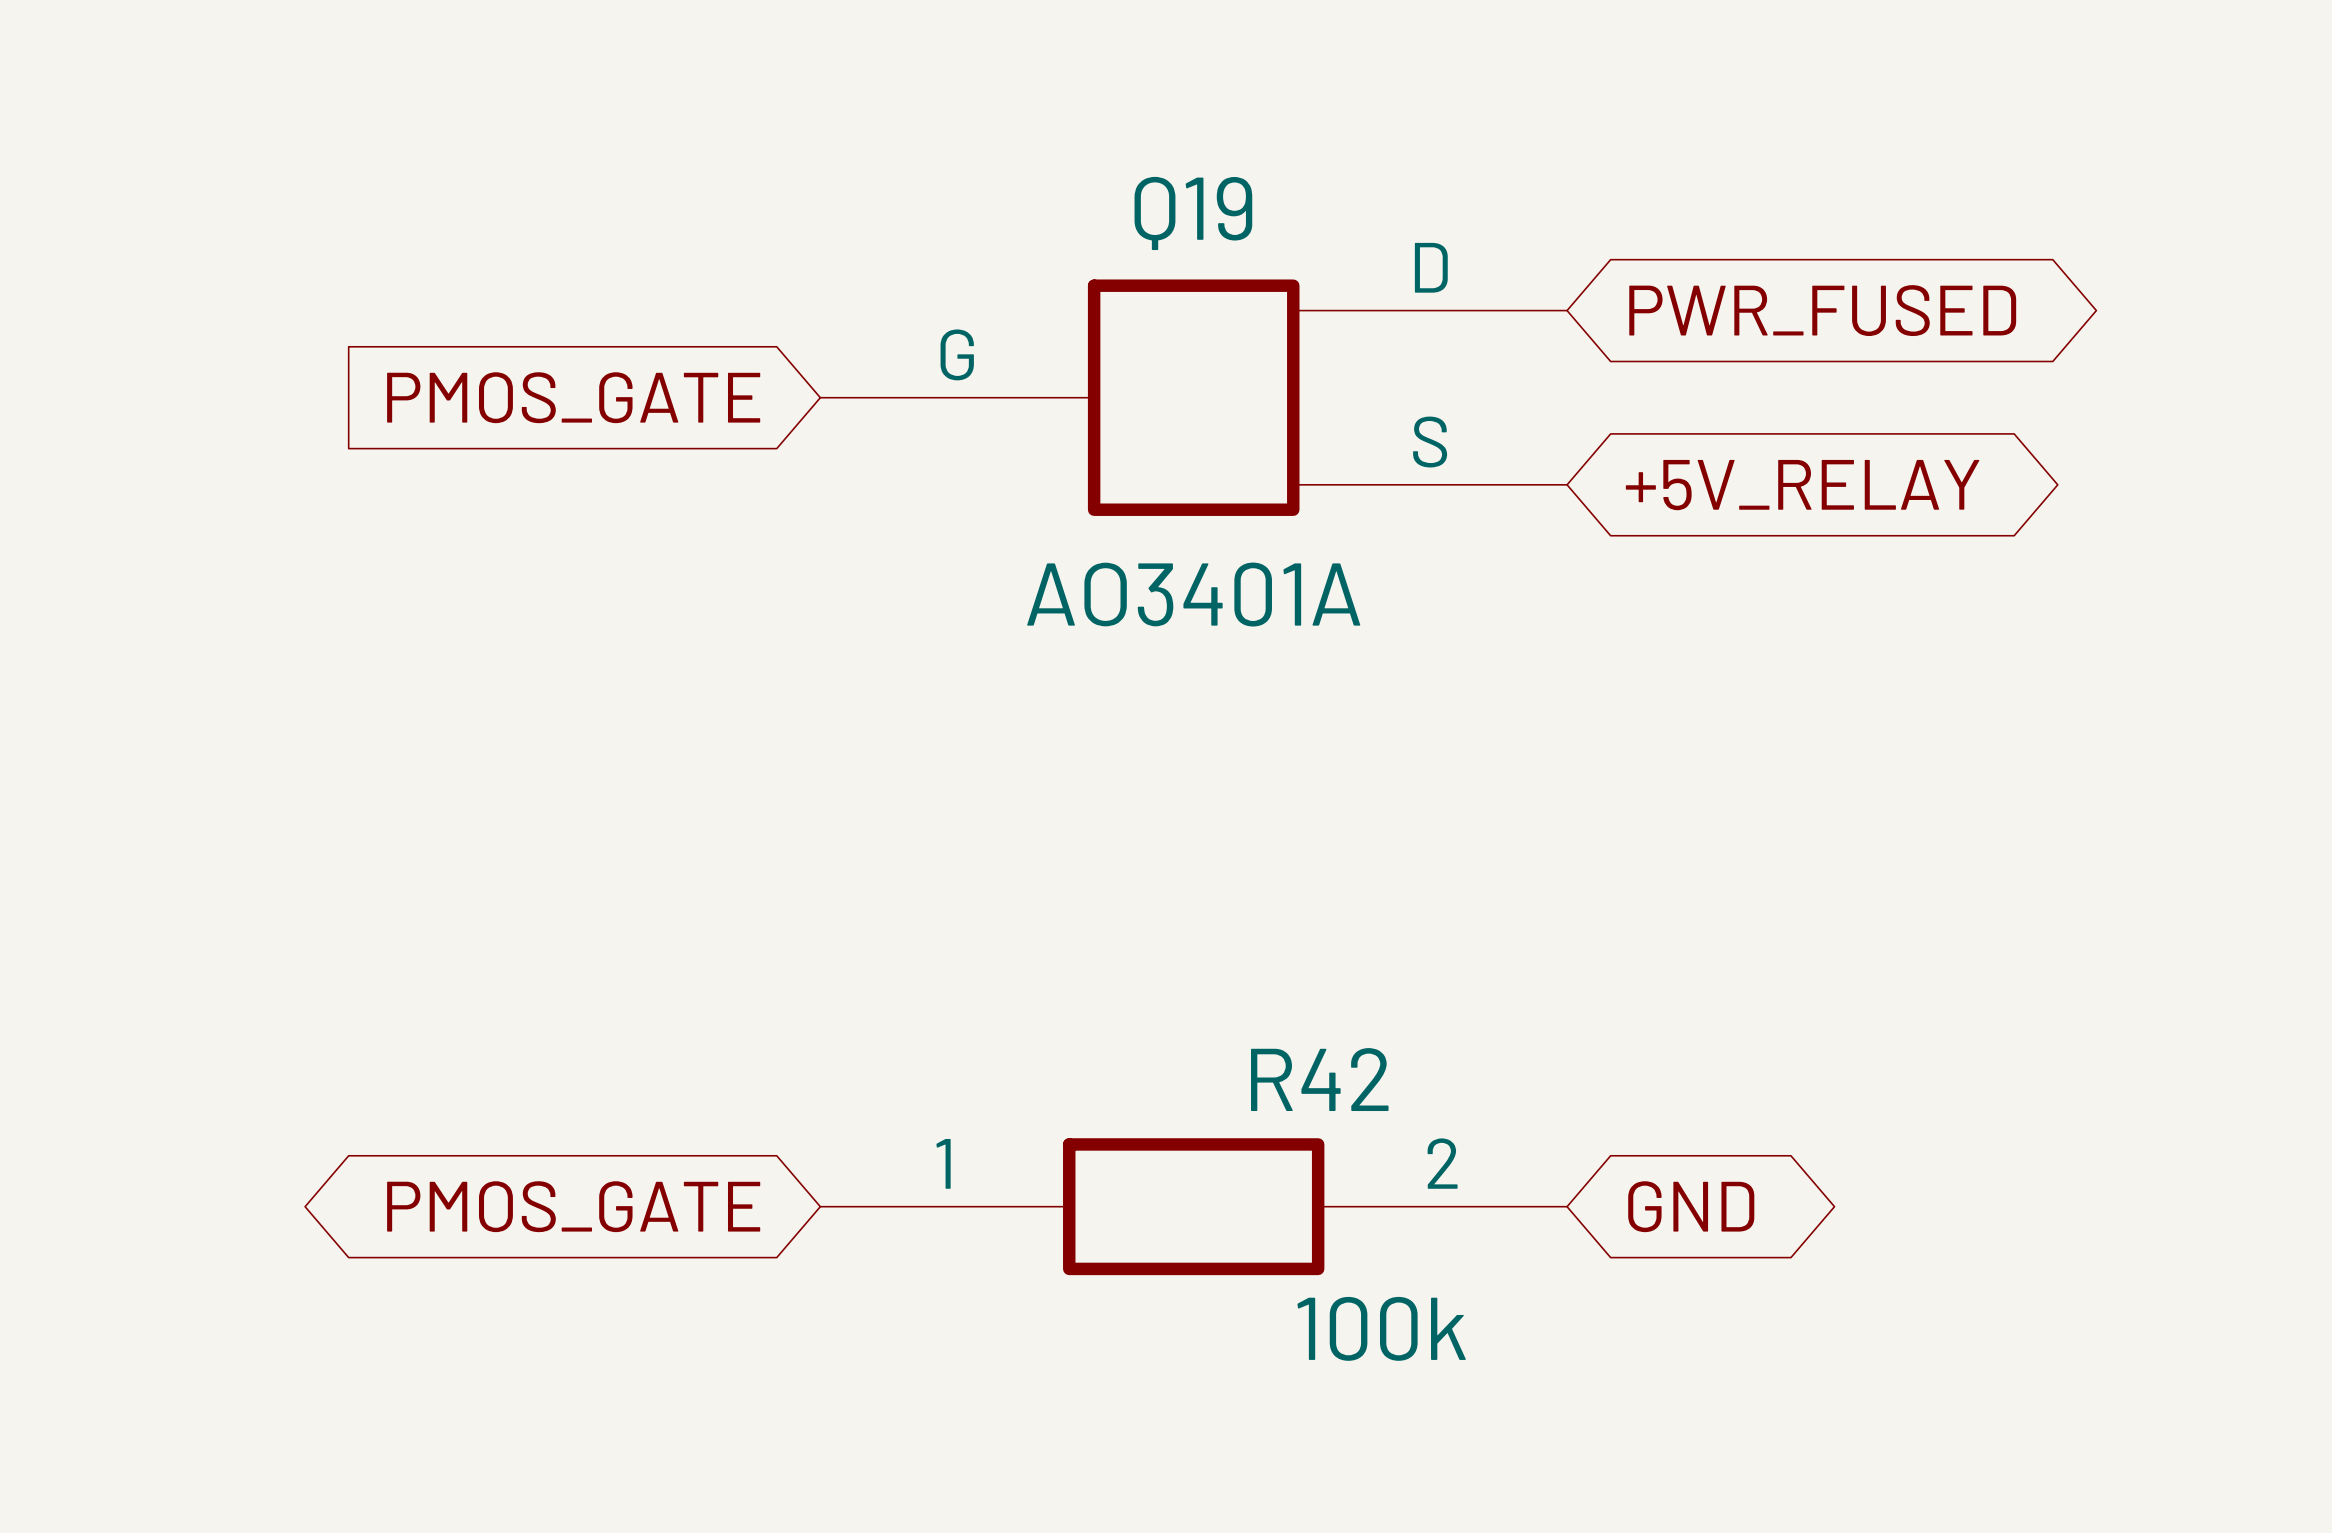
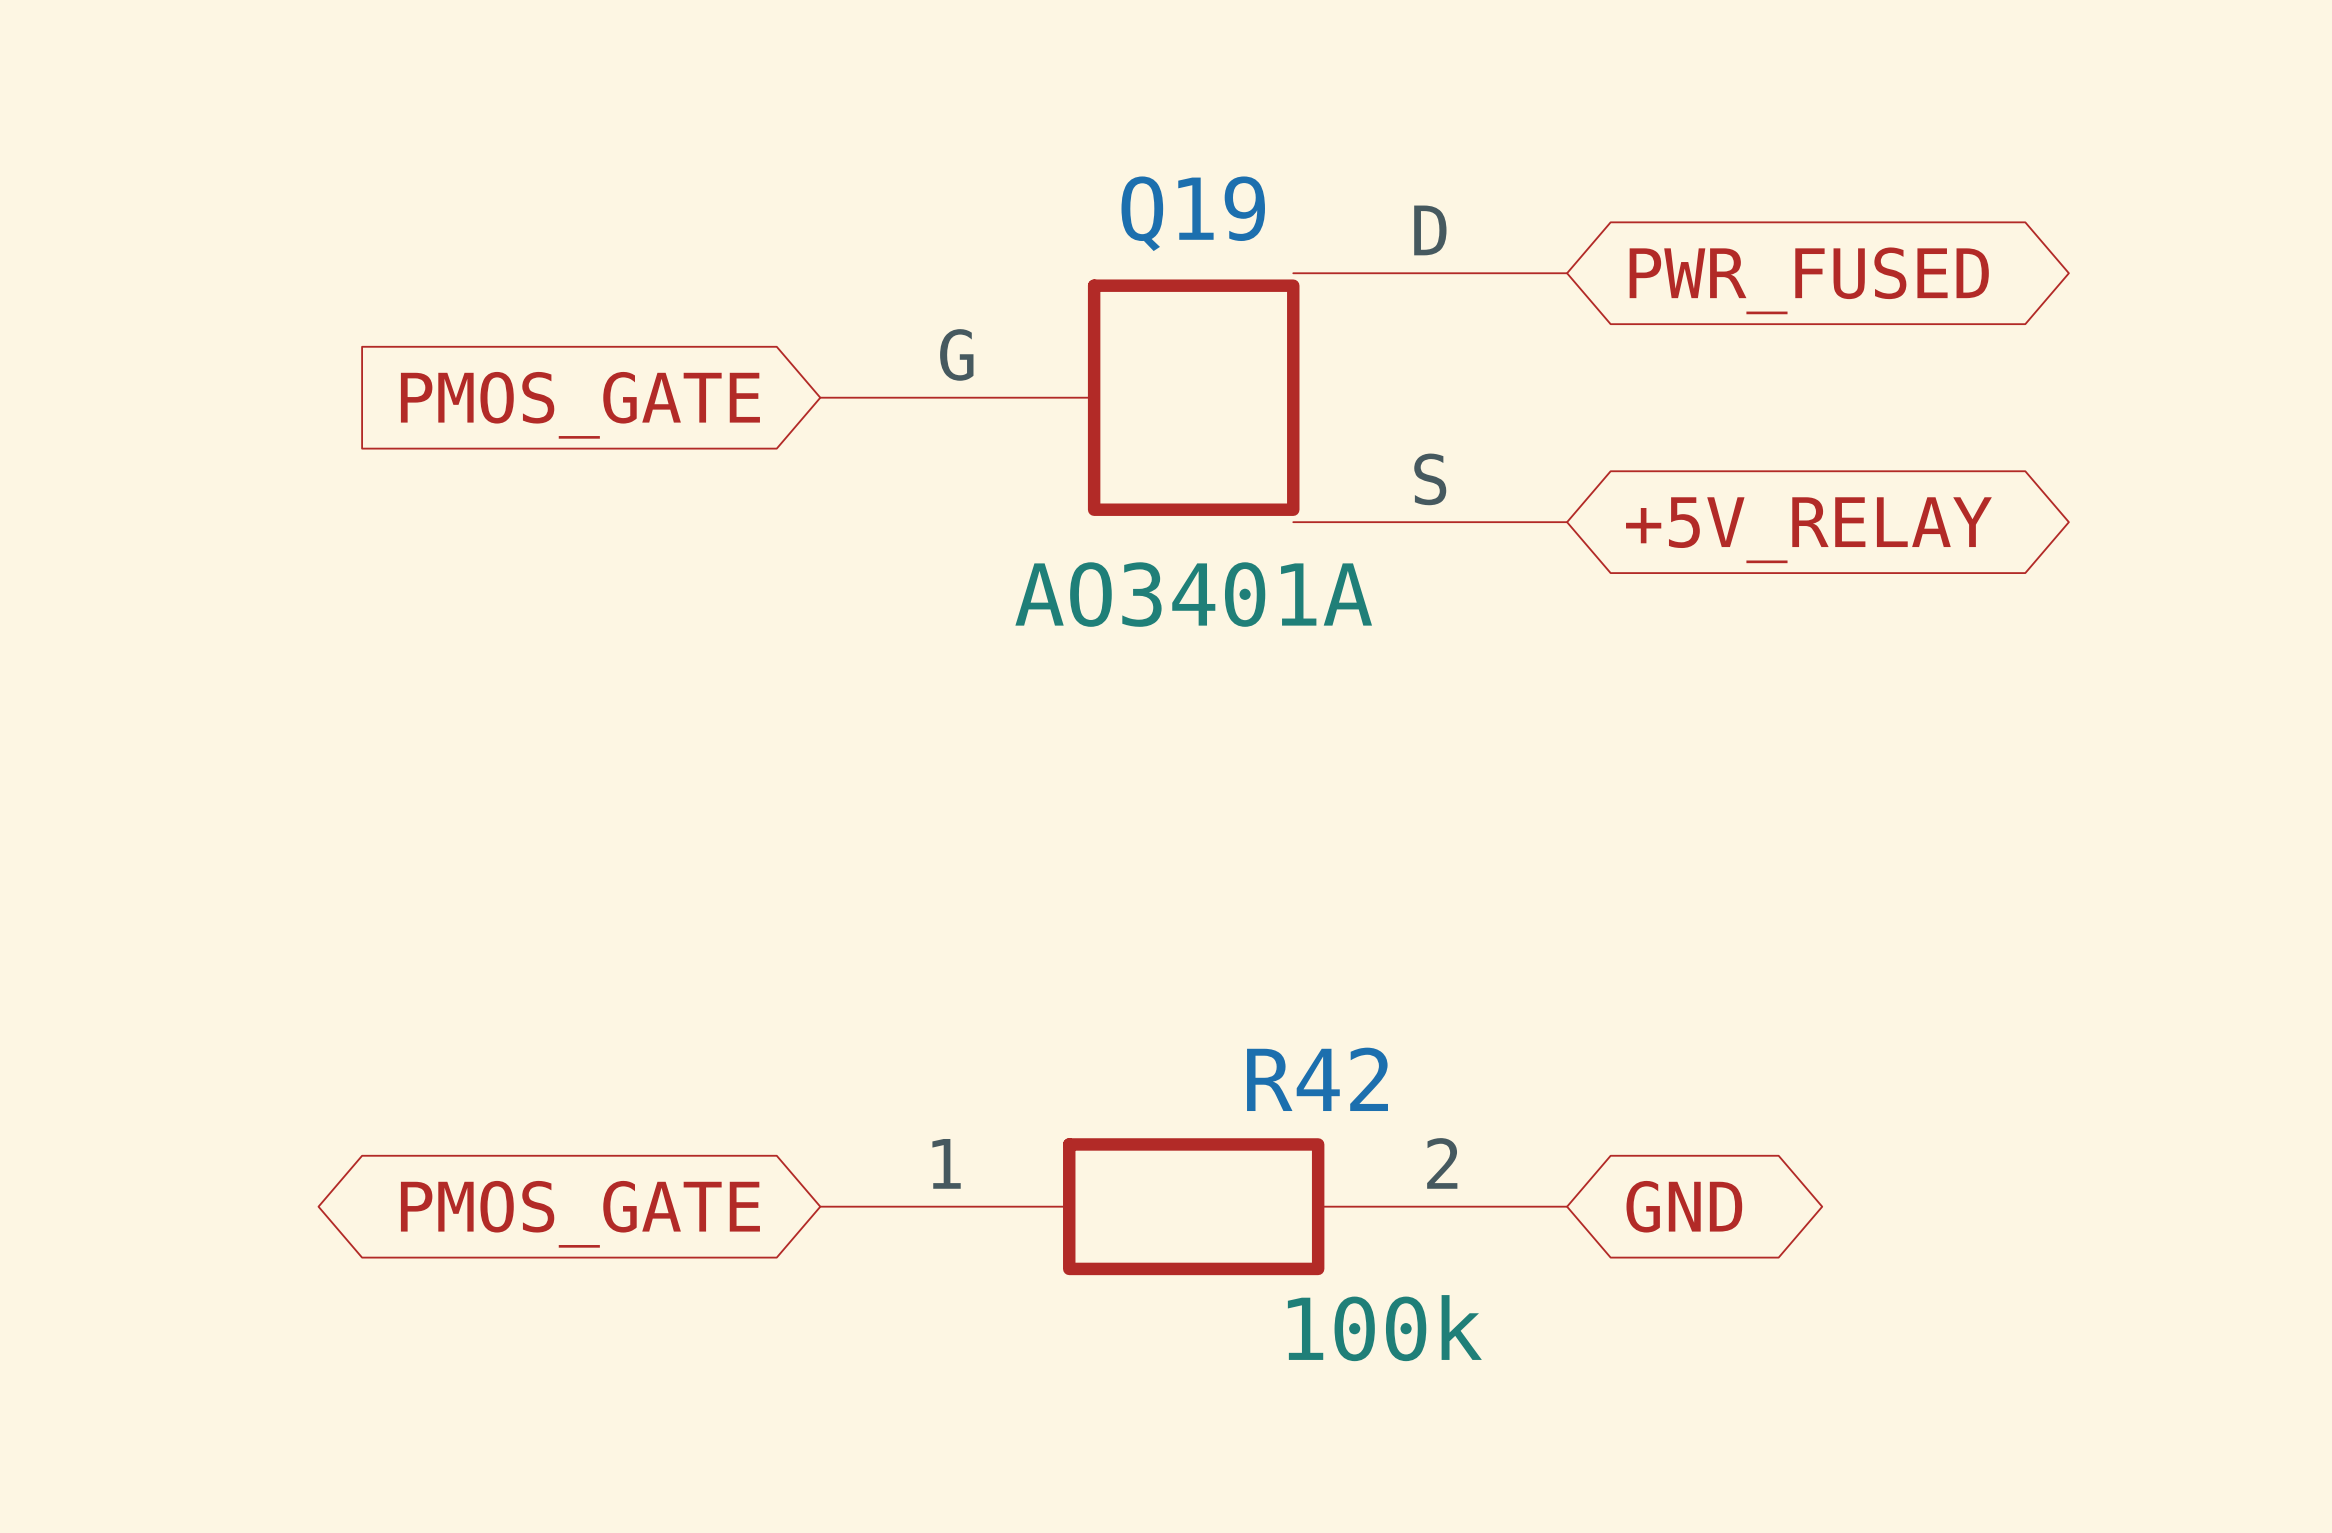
Q19 symbol: [820, 279, 1568, 516] -> [820, 273, 1568, 523]
global label position: PWR_FUSED (1822, 310) -> PWR_FUSED (1809, 280)
global label position: +5V_RELAY (1802, 485) -> +5V_RELAY (1808, 530)

